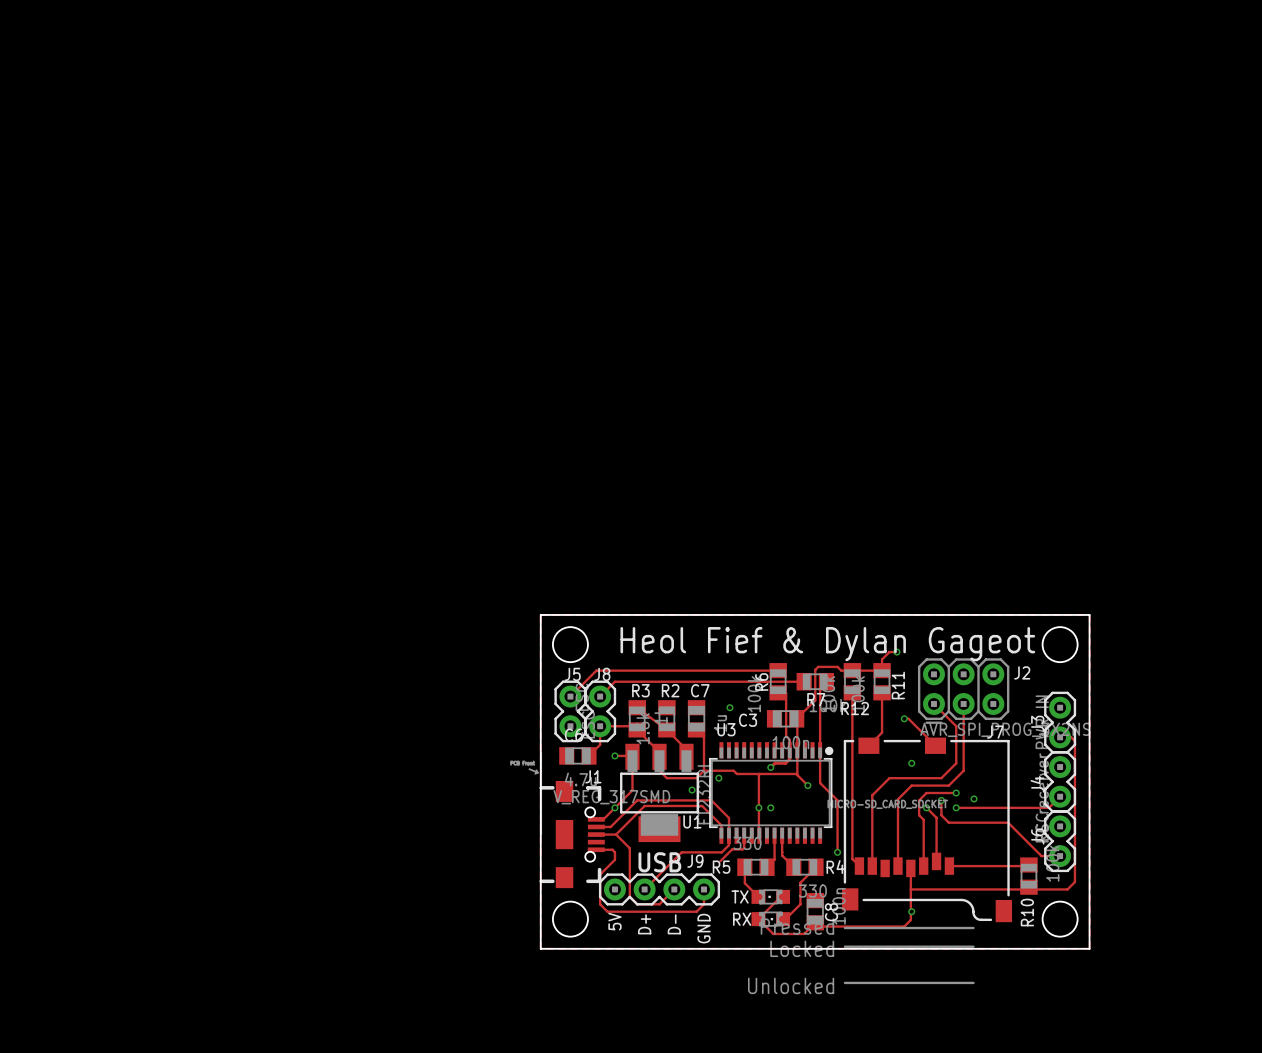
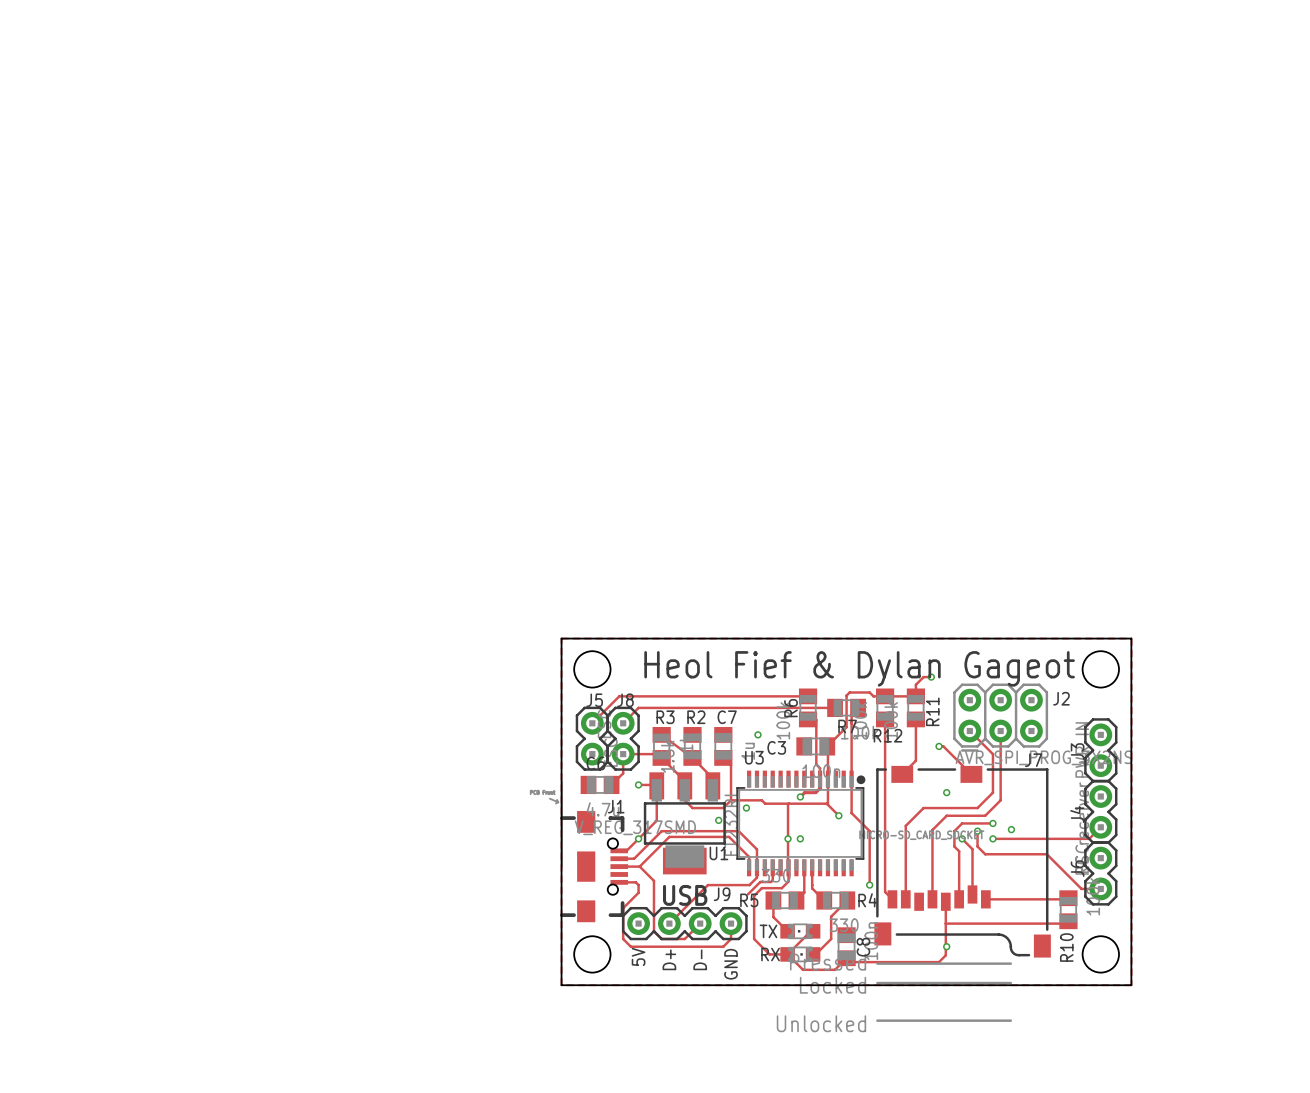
track: (1060, 737) (1071, 737) (1074, 741) (1074, 882) (1067, 889) (1030, 889) (1028, 887) -> none
track: none -> (788, 869) (788, 881) (781, 888) (761, 888) (754, 895) (754, 939) (769, 954) (787, 954)

